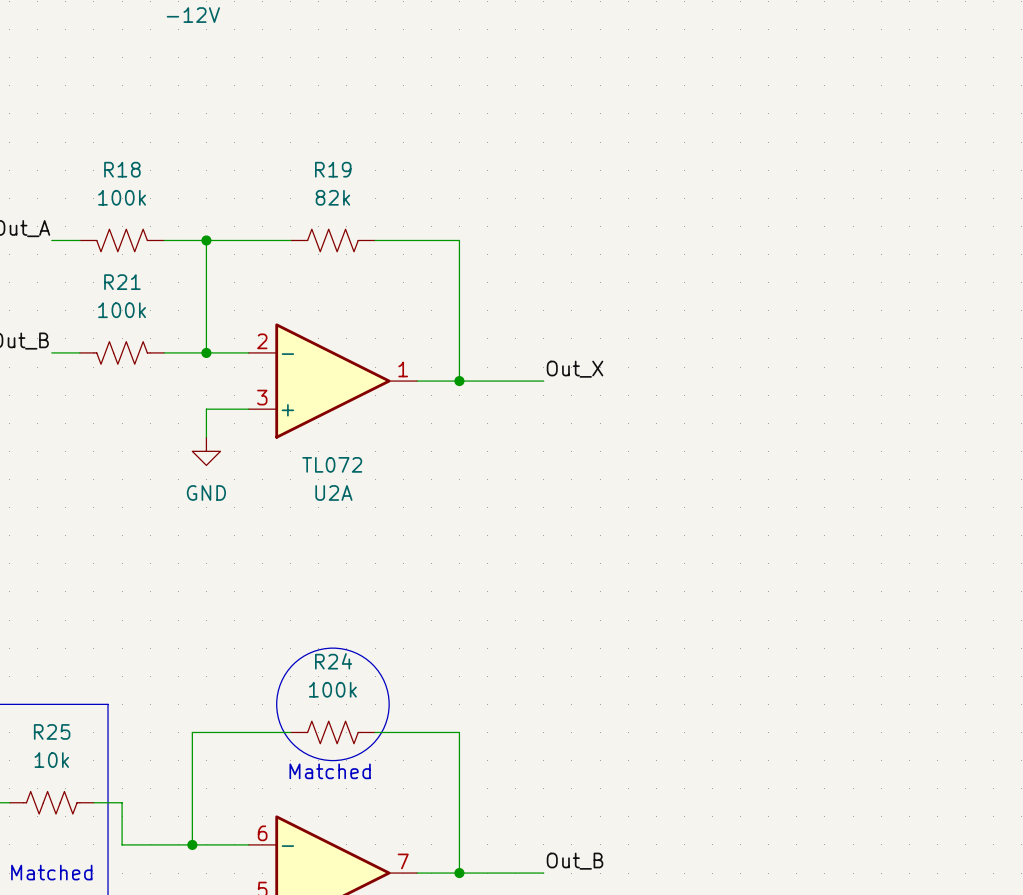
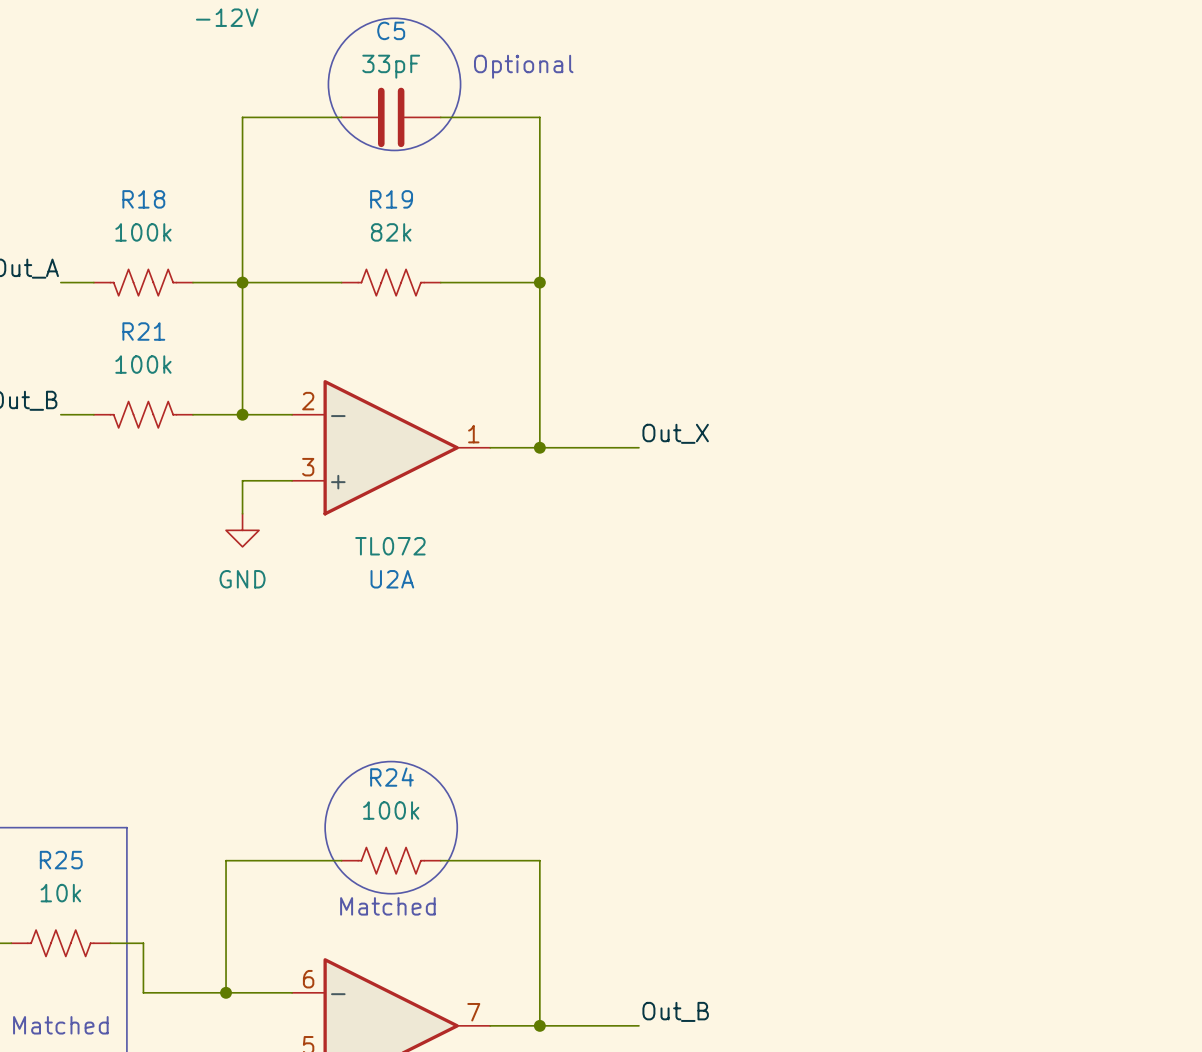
drawing: none -> [328, 18, 461, 151]
text: none -> Optional (523, 66)
wire: none -> (341, 117) (242, 117) (242, 282)
C5: none -> 33pF (391, 117)
wire: none -> (440, 117) (539, 117) (539, 282)
junction: none -> (539, 282)

